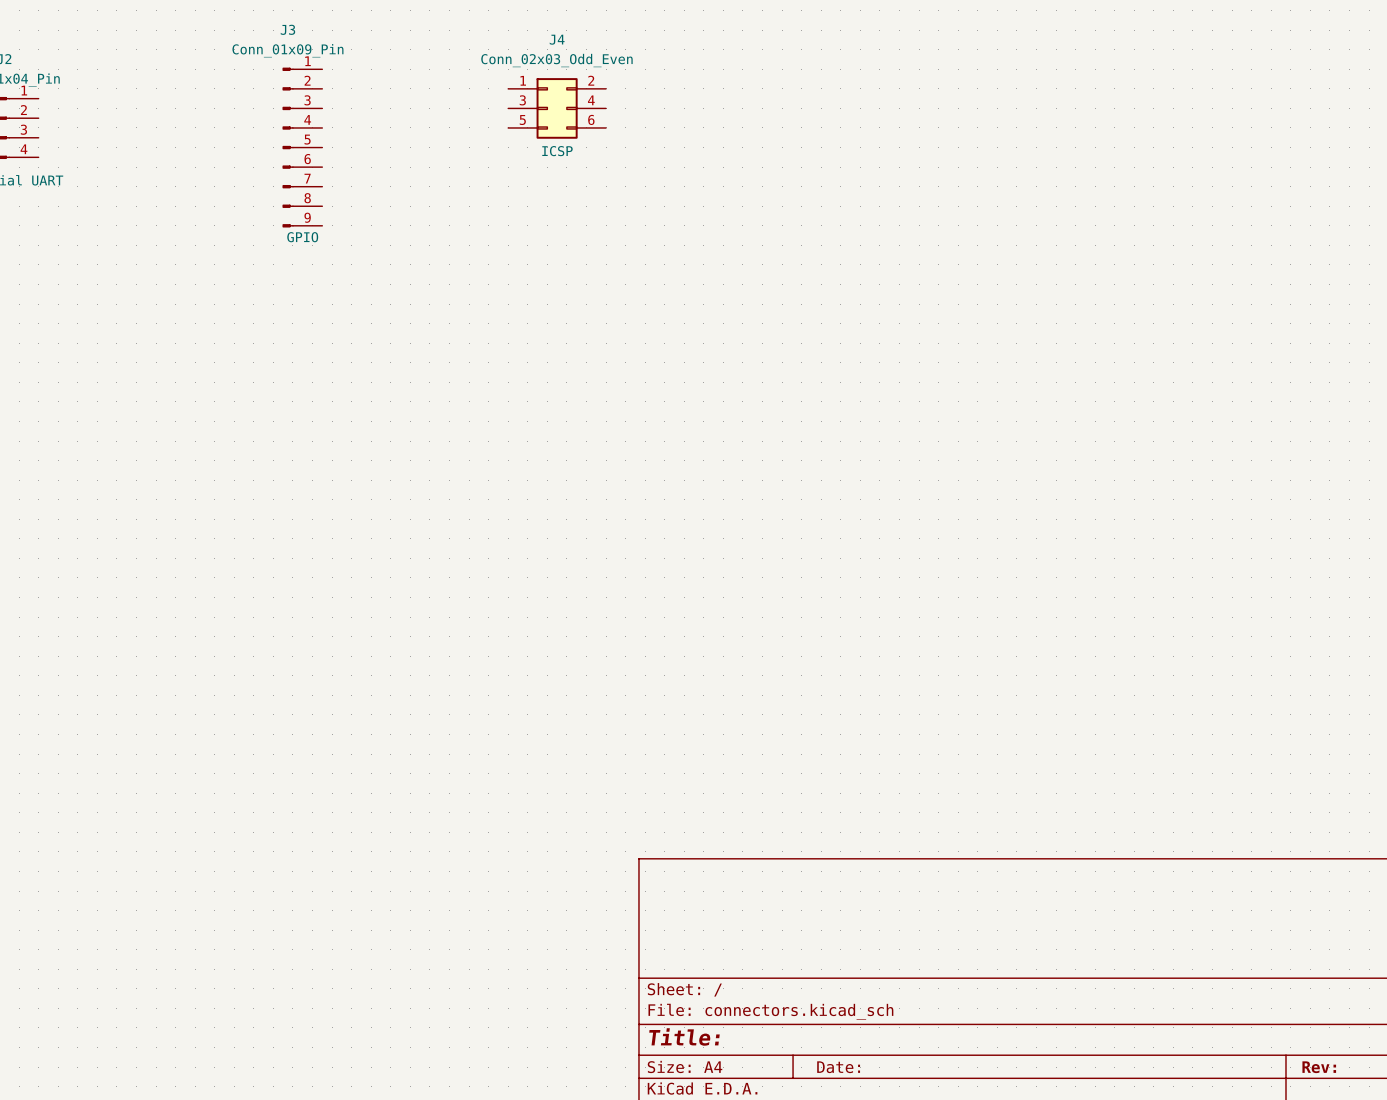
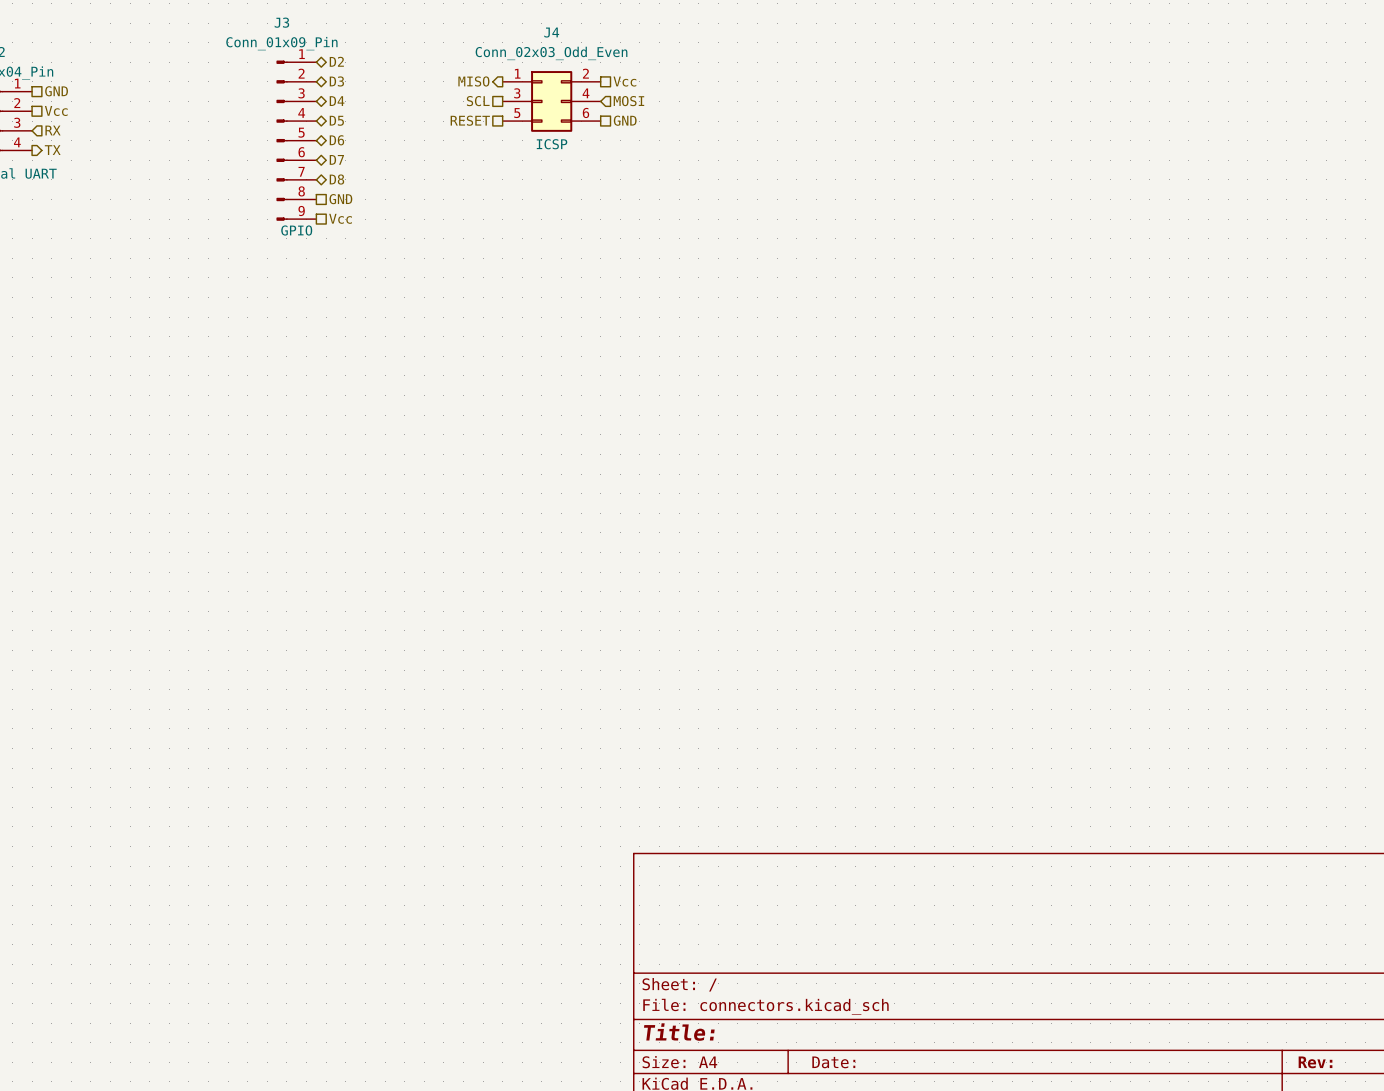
hierarchical label: none -> D2 (336, 61)
hierarchical label: none -> D3 (336, 81)
hierarchical label: none -> MISO (473, 81)
hierarchical label: none -> Vcc (624, 81)
hierarchical label: none -> GND (56, 91)
hierarchical label: none -> D4 (337, 101)
hierarchical label: none -> SCL (478, 101)
hierarchical label: none -> MOSI (628, 101)
hierarchical label: none -> Vcc (56, 110)
hierarchical label: none -> D5 (336, 120)
hierarchical label: none -> RESET (470, 120)
hierarchical label: none -> GND (625, 120)
hierarchical label: none -> RX (53, 130)
hierarchical label: none -> D6 (336, 140)
hierarchical label: none -> TX (52, 150)
hierarchical label: none -> D7 (336, 159)
hierarchical label: none -> D8 (336, 179)
hierarchical label: none -> GND (340, 199)
hierarchical label: none -> Vcc (340, 218)

